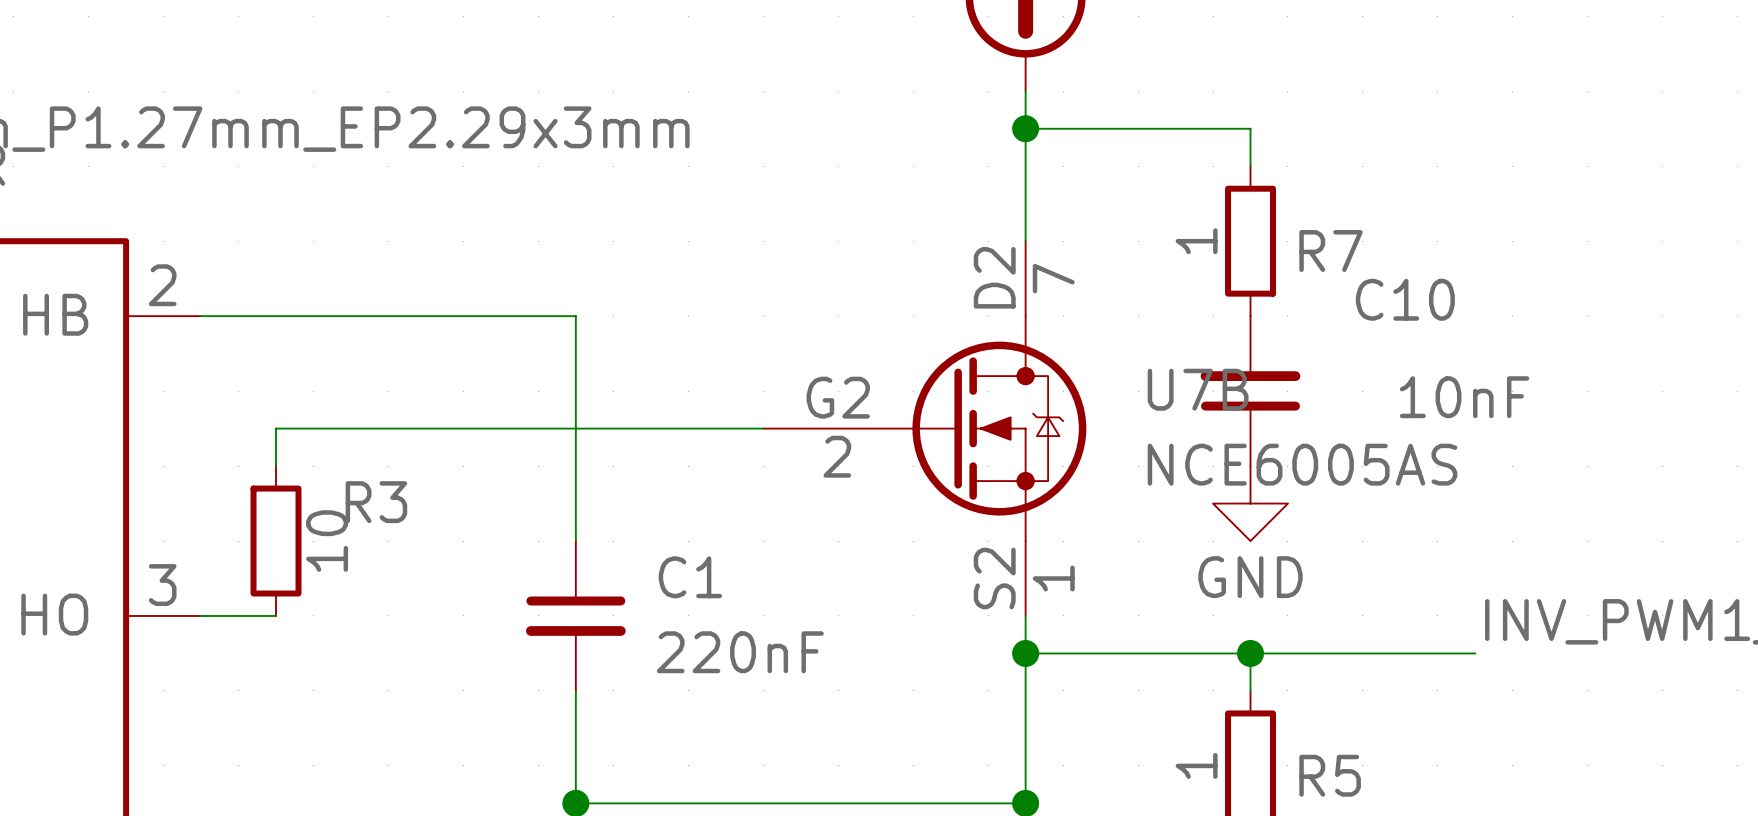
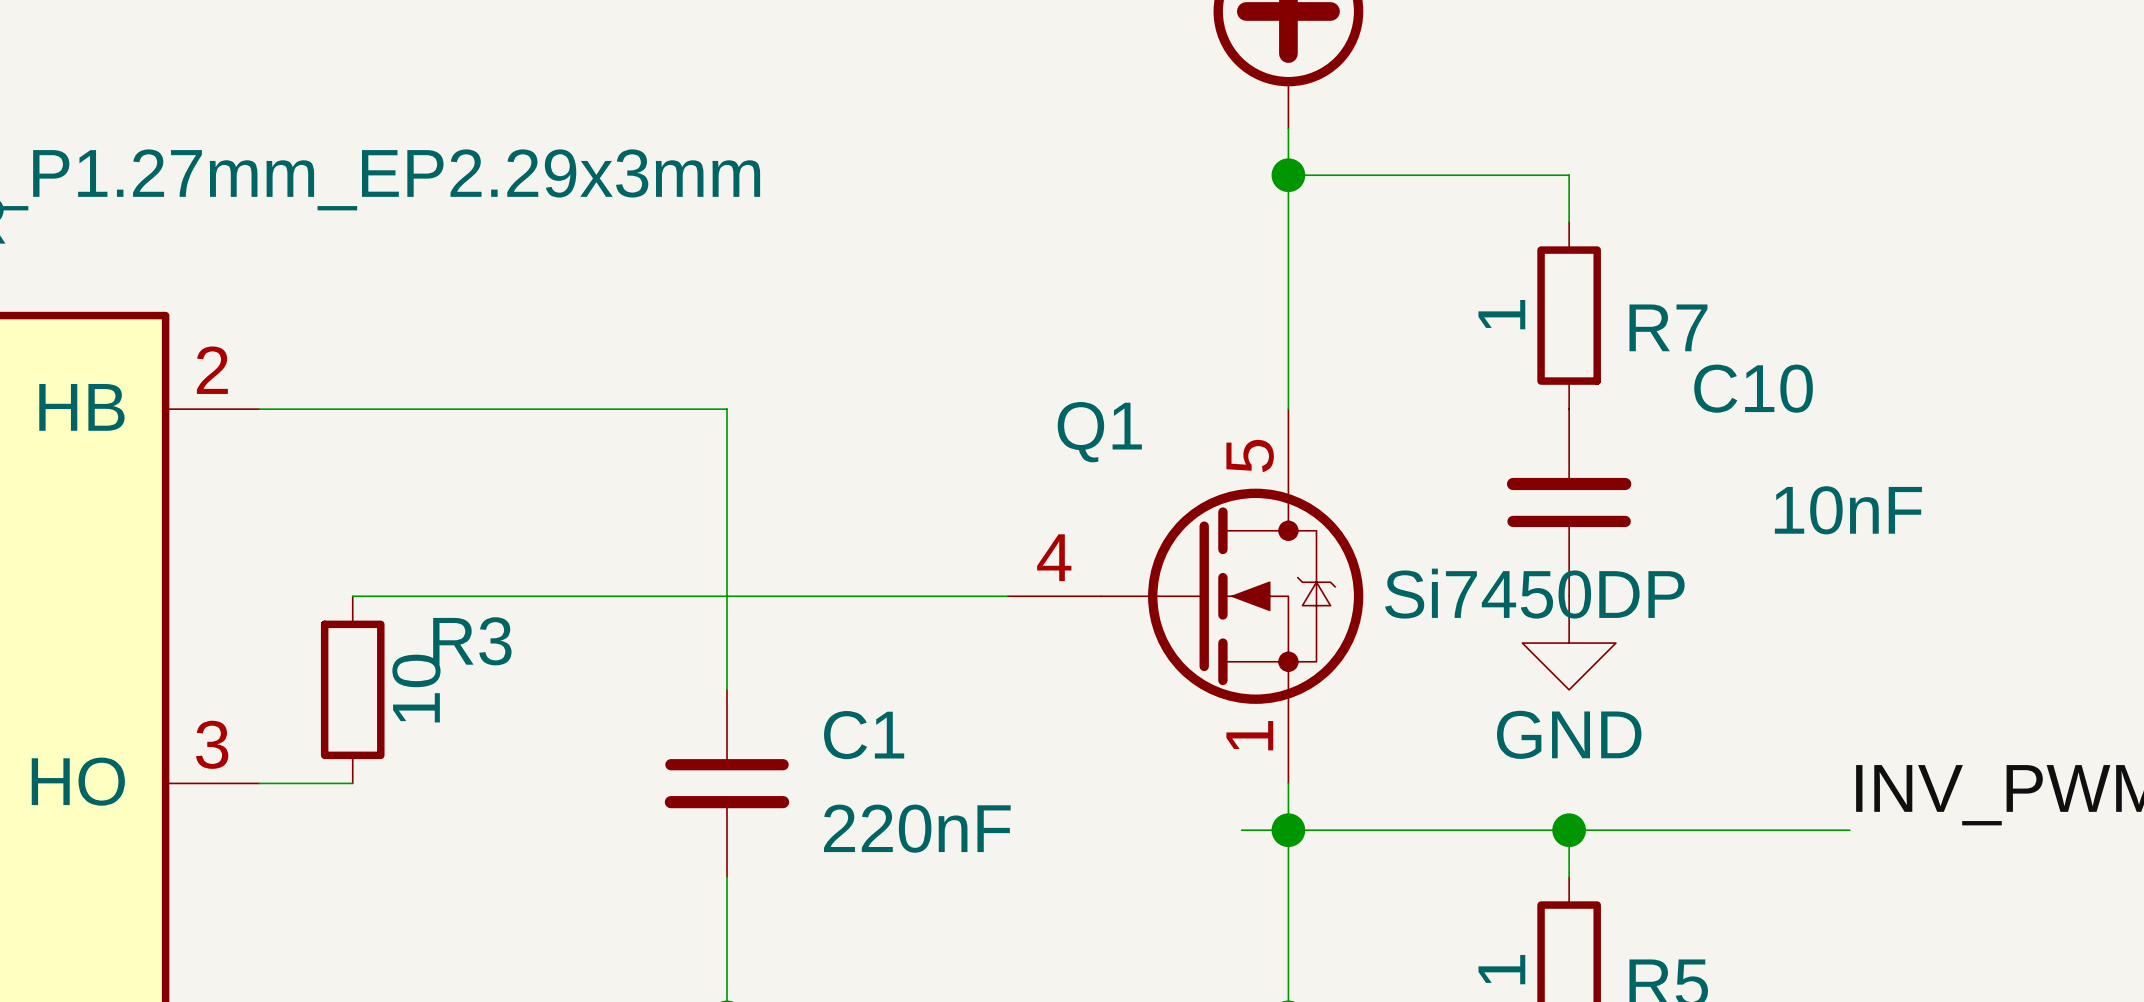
wire: (763, 428) (276, 428) (276, 466) -> (1007, 596) (352, 596)
U7B: NCE6005AS (924, 428) -> none
Q1: none -> Si7450DP (1185, 596)
wire: none -> (1241, 830) (1288, 830)

